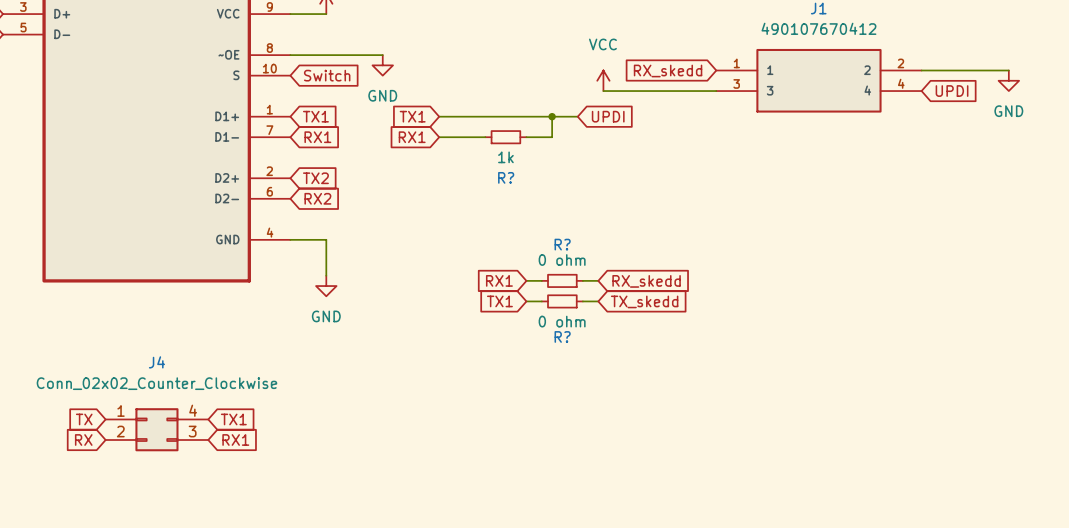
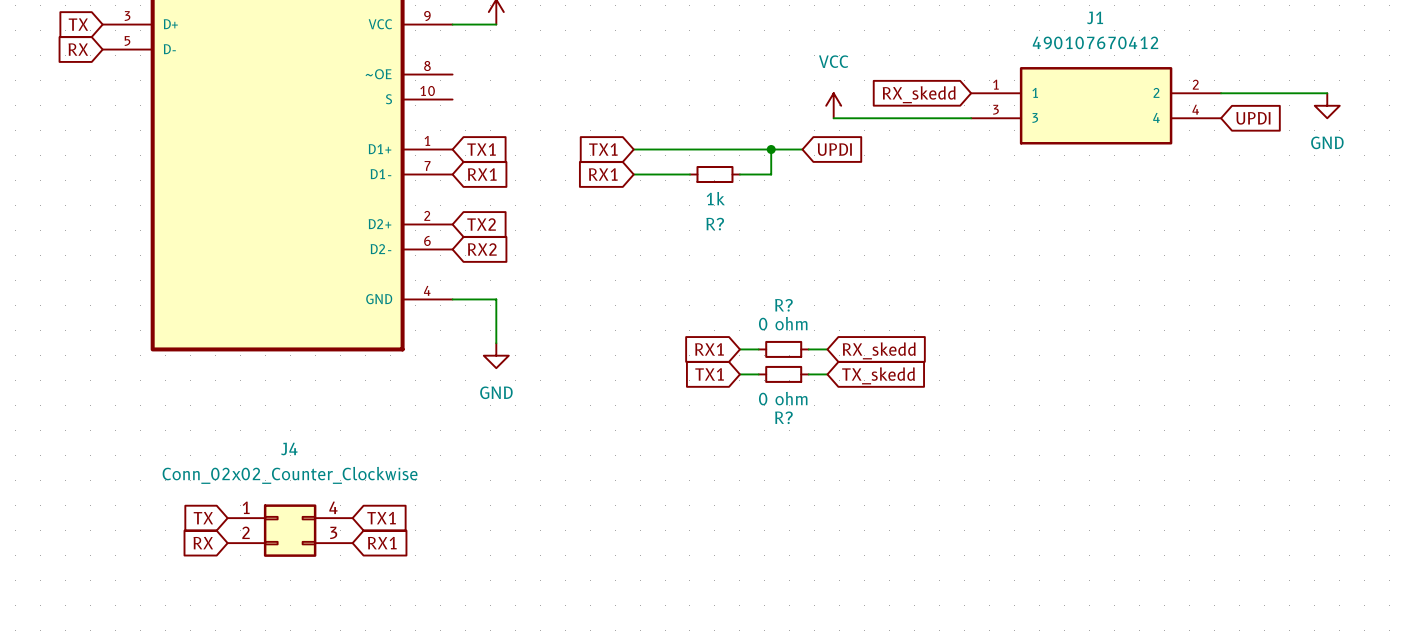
wire: (290, 55) (382, 55) -> none
power symbol: GND (382, 65) -> none
global label: Switch (327, 75) -> none

